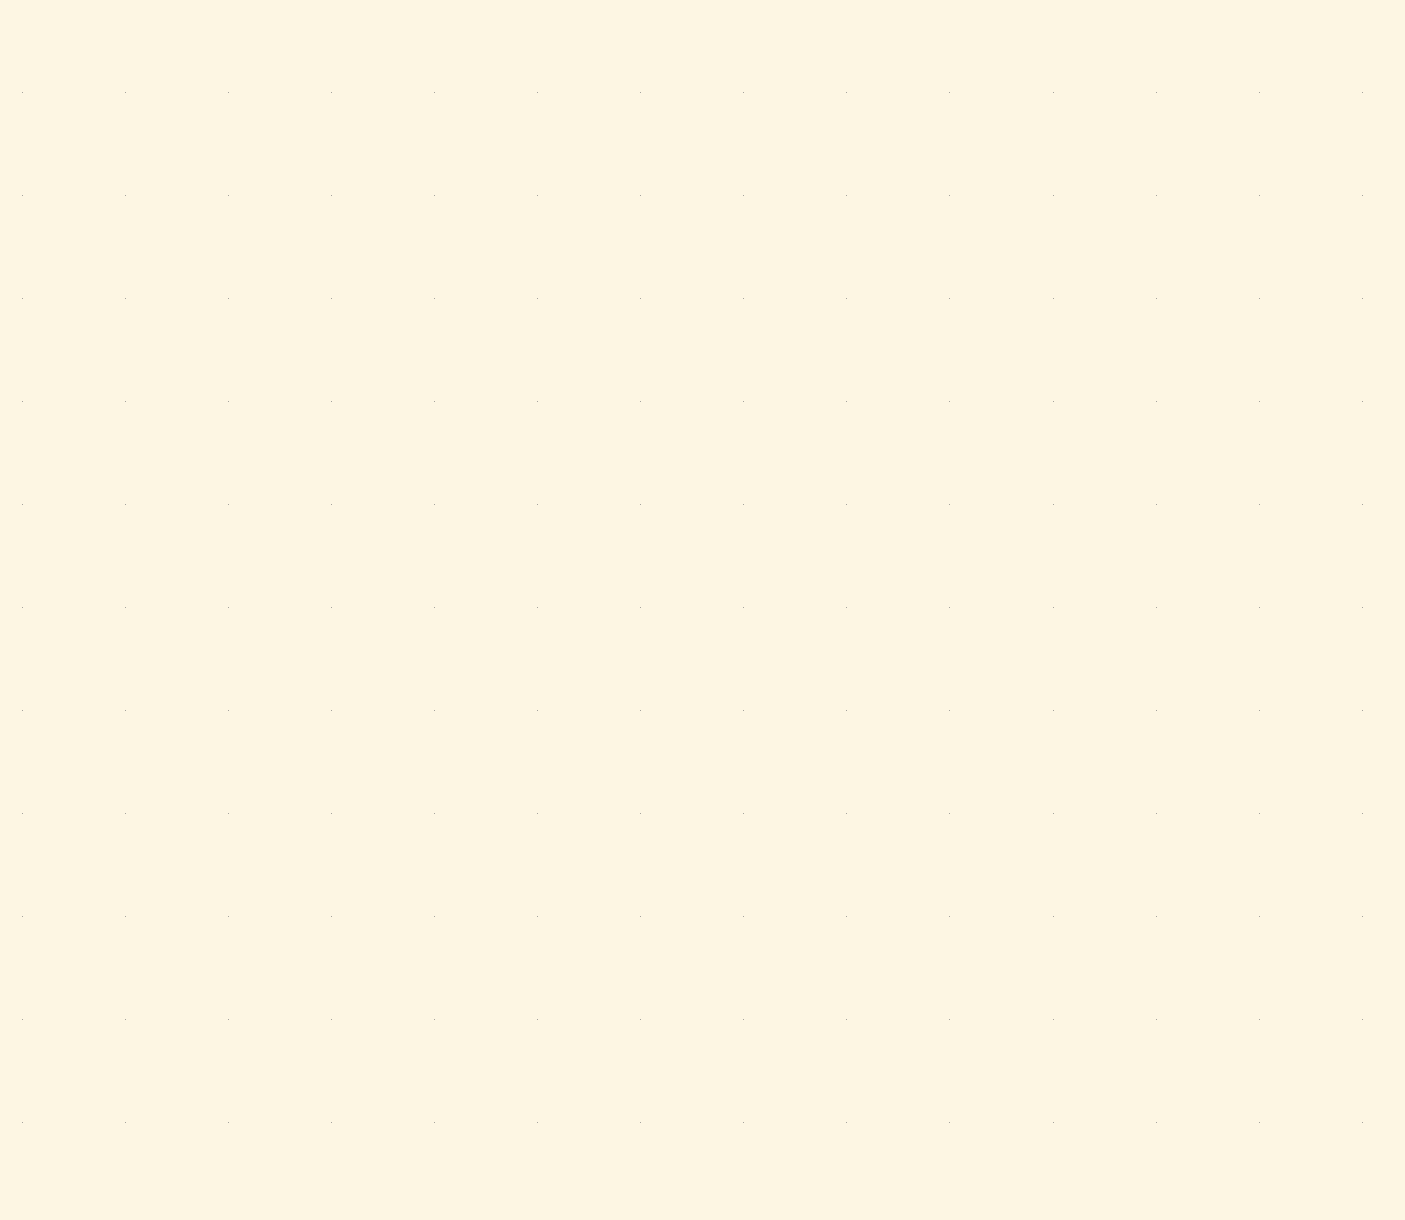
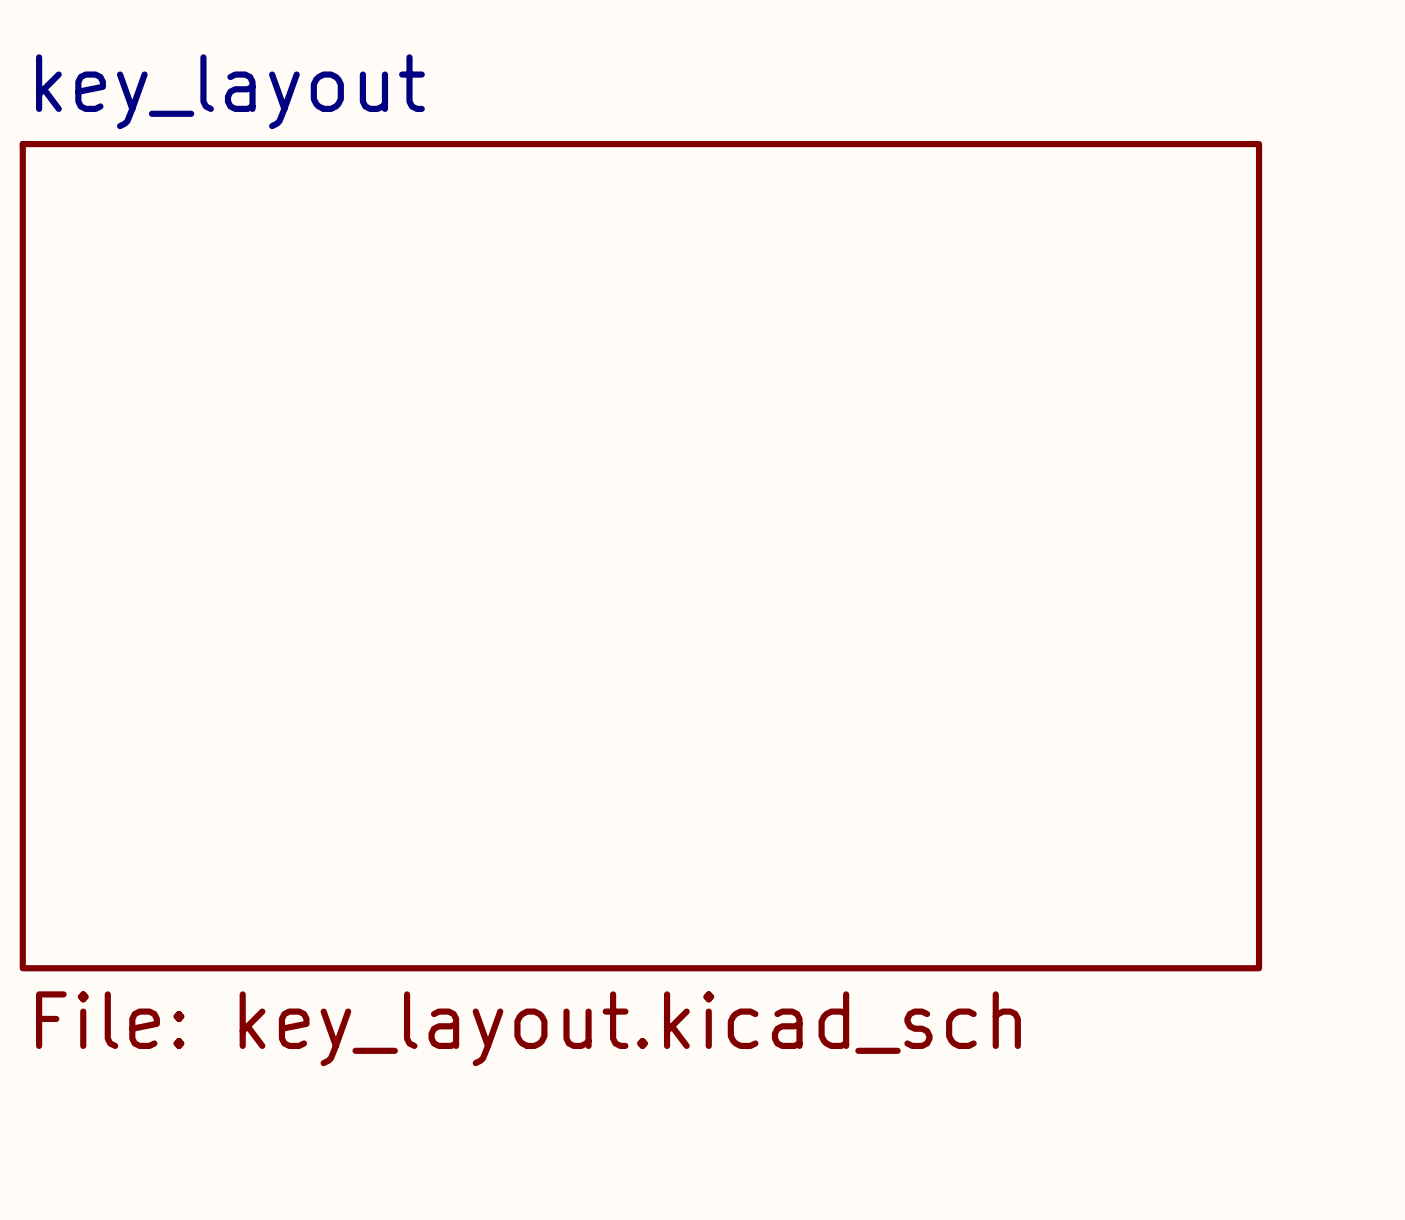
sheet key_layout: none -> File: key_layout.kicad_sch (640, 556)

